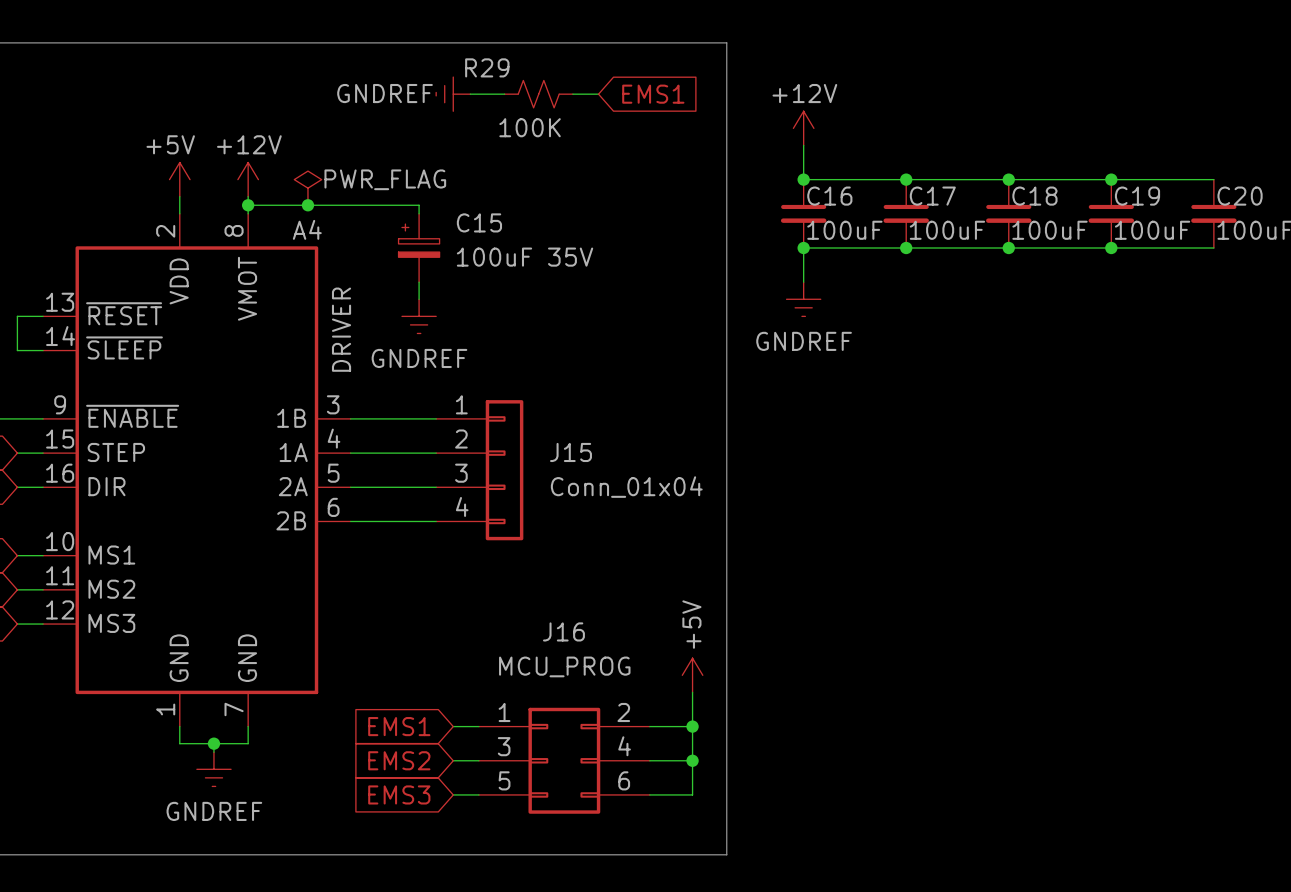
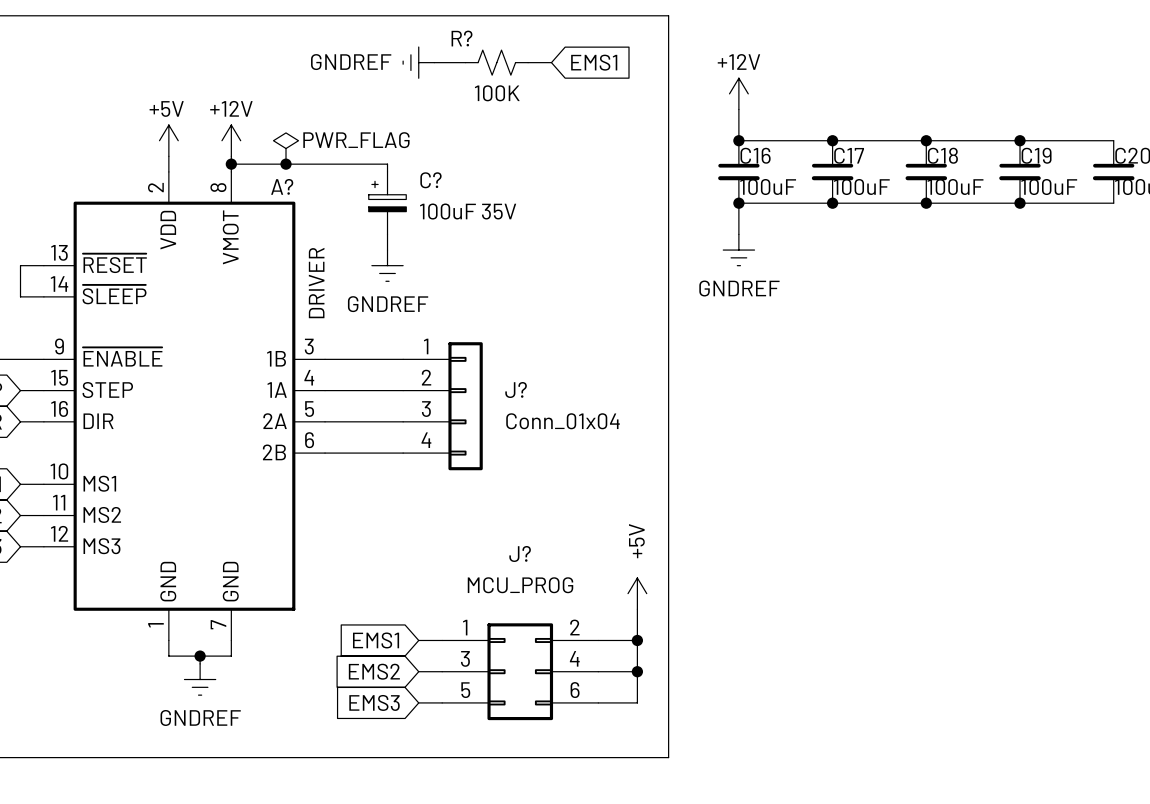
R29 name: R29 (487, 67) -> R? (462, 38)
C15 name: C15 (479, 222) -> C? (430, 180)
A4 name: A4 (307, 229) -> A? (282, 186)
J15 name: J15 (571, 452) -> J? (516, 390)
J16 name: J16 (563, 631) -> J? (520, 553)

